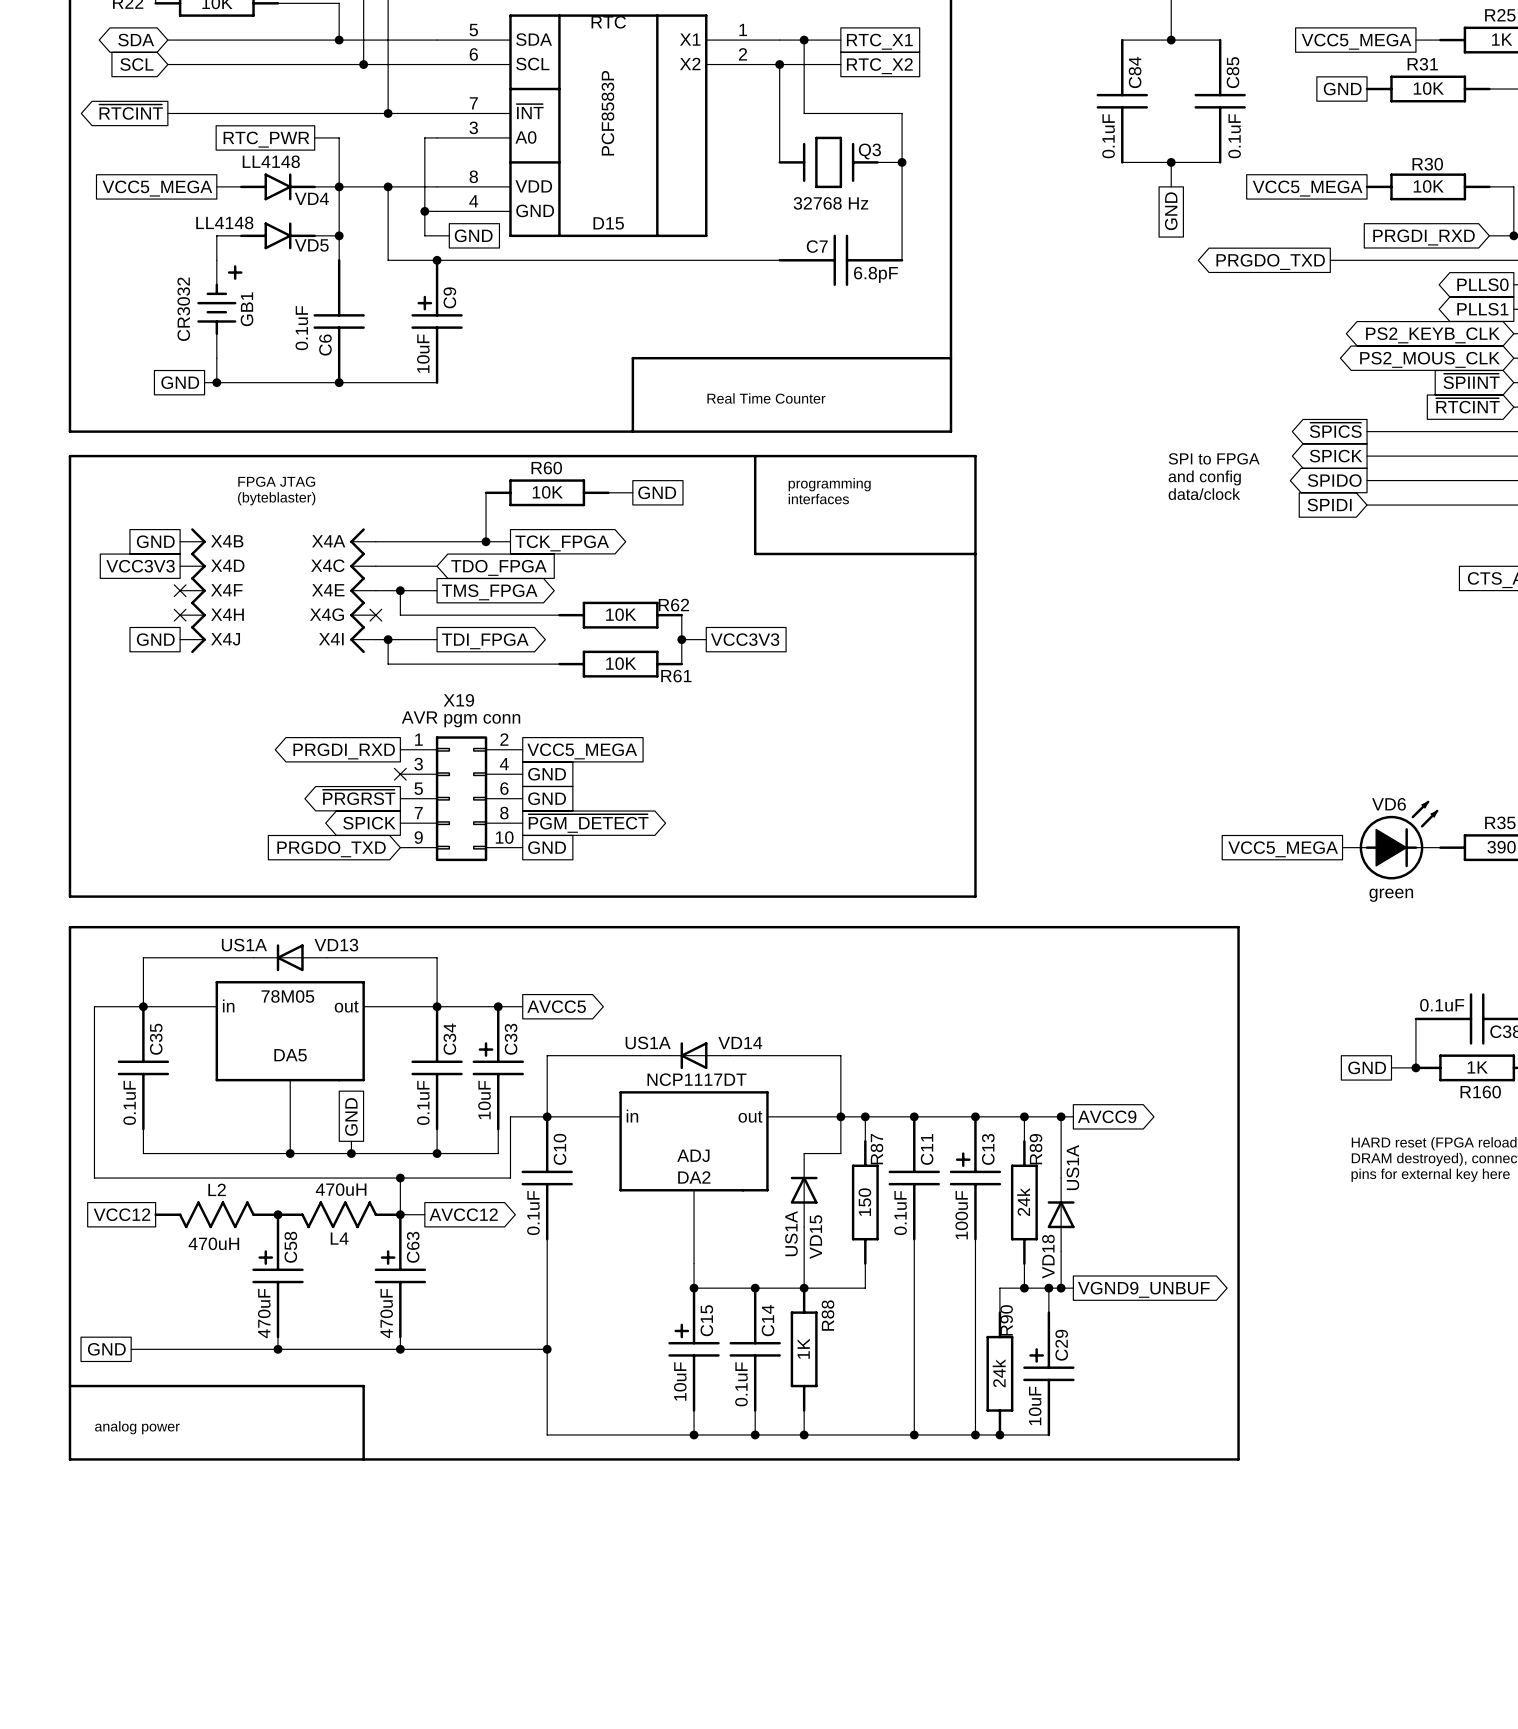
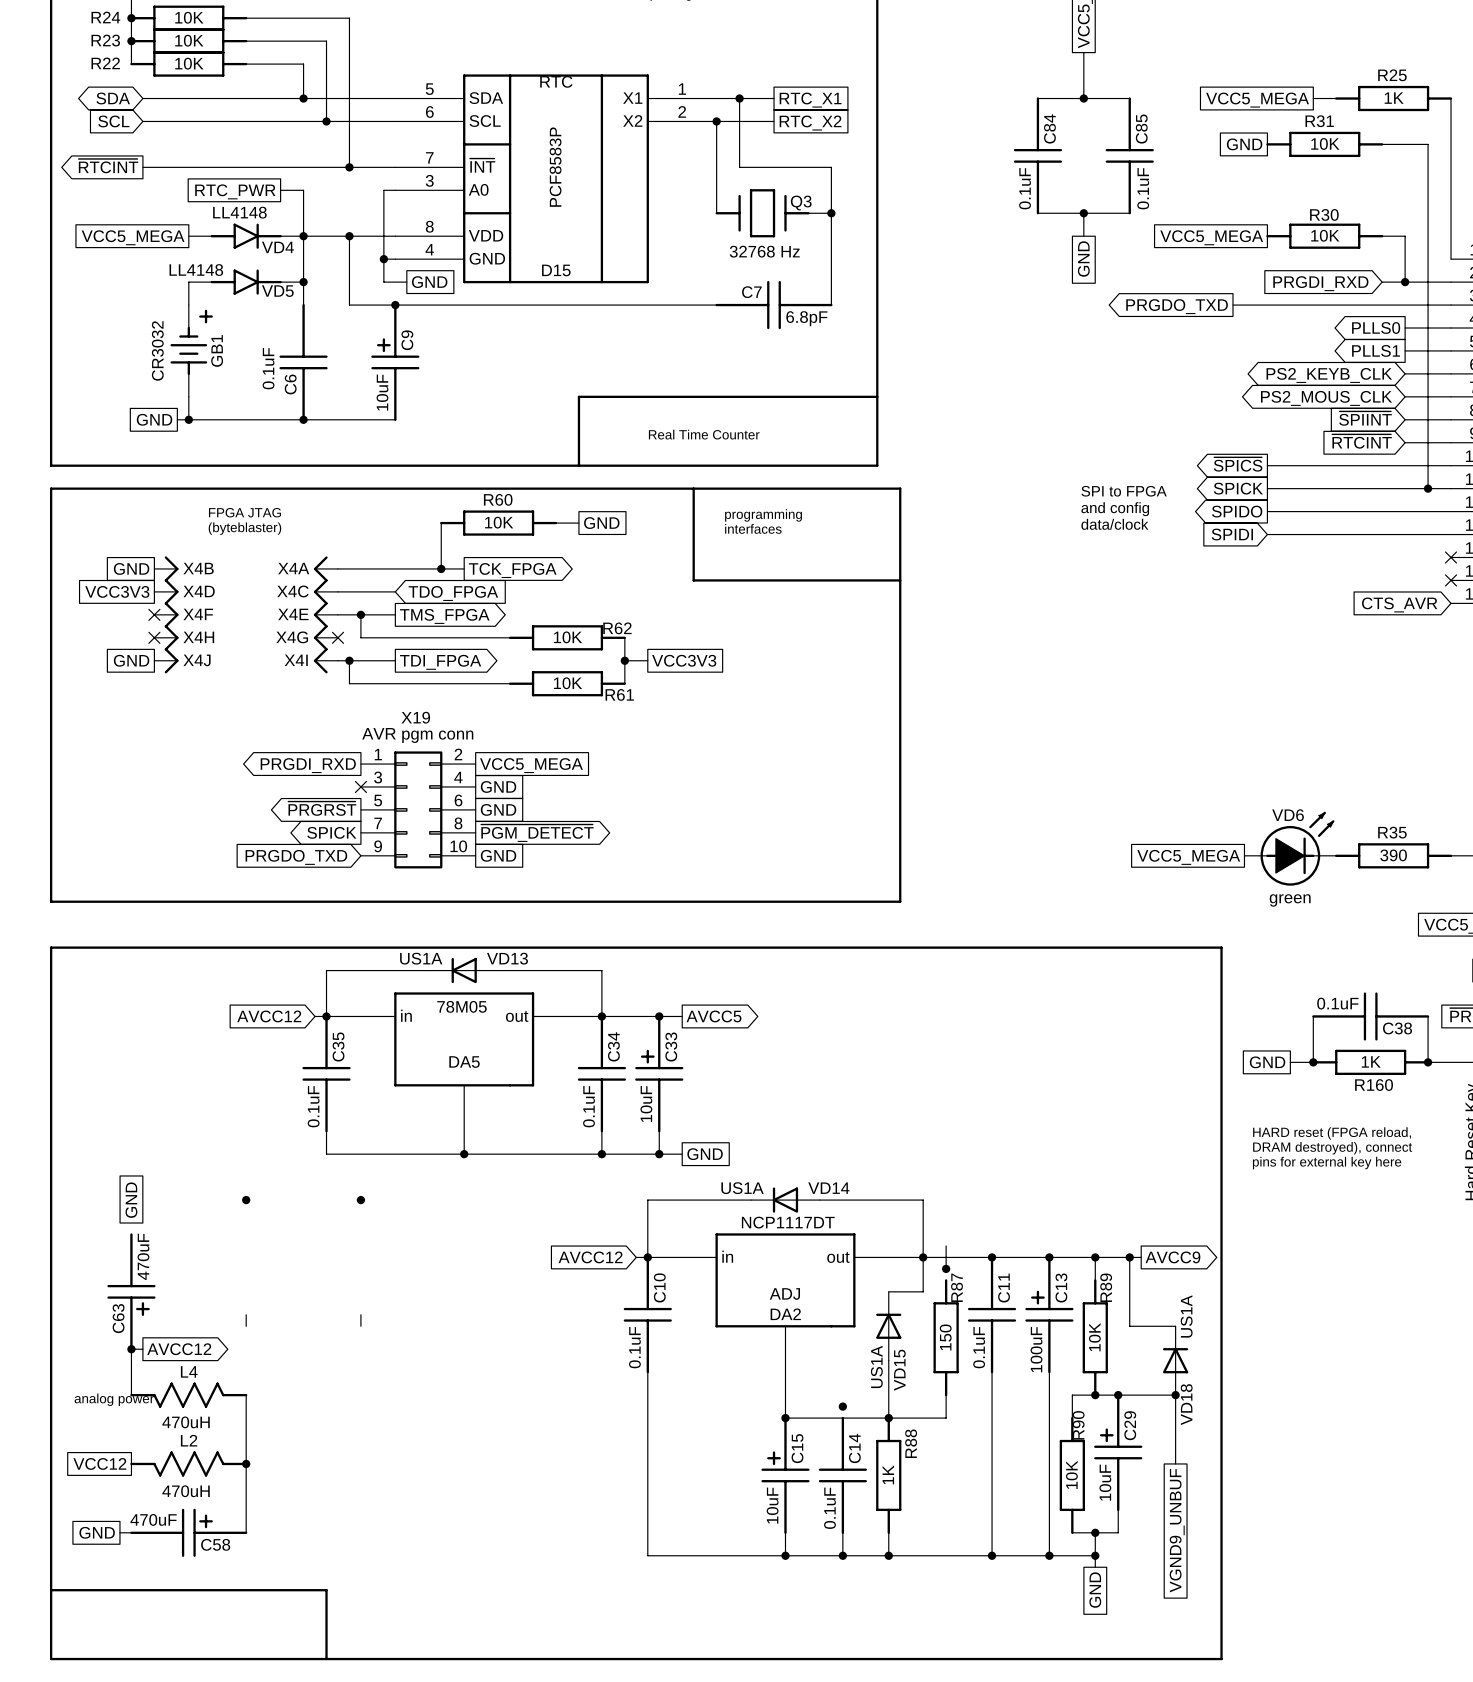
line: (69, 945) (69, 927) (1238, 927) (1238, 1459) (69, 1459) -> (51, 947) (1221, 947) (1221, 1659) (51, 1659) (51, 1429)
wire: (253, 957) (143, 957) (143, 1006) (94, 1006) (94, 1178) (510, 1178) (510, 1116) (547, 1116) (547, 1055) (657, 1055) -> none
VD13 position: (290, 957) -> (464, 970)
wire: (326, 957) (437, 957) (437, 1006) (522, 1006) -> (498, 970) (601, 970) (601, 1016) (682, 1016)
wire: none -> (429, 970) (326, 970) (326, 1016) (315, 1016)
C35 symbol: [117, 1005, 170, 1131] -> [302, 1015, 351, 1133]
C34 symbol: [411, 1005, 463, 1131] -> [577, 1015, 626, 1133]
C33 symbol: [472, 1005, 524, 1131] -> [635, 1015, 684, 1133]
junction: (143, 1006) -> none
junction: (437, 1006) -> none
junction: (498, 1006) -> none
global label position: AVCC5 (556, 1006) -> AVCC5 (713, 1016)
global label: none -> AVCC12 (269, 1016)
junction: none -> (326, 1016)
junction: none -> (601, 1016)
junction: none -> (659, 1016)
VD14 position: (694, 1055) -> (785, 1200)
wire: (730, 1055) (840, 1055) (840, 1153) (804, 1153) -> none
DA5 position: (290, 1067) -> (464, 1073)
C10 symbol: [521, 1115, 573, 1241] -> [623, 1256, 672, 1374]
C11 symbol: [888, 1115, 940, 1241] -> [967, 1256, 1017, 1374]
C13 symbol: [949, 1115, 1002, 1241] -> [1025, 1256, 1074, 1374]
global label: GND (351, 1116) -> none
junction: (547, 1116) -> none
wire: (840, 1116) (1073, 1116) -> (923, 1257) (1141, 1257)
junction: (840, 1116) -> none
wire: (865, 1116) (865, 1141) -> (659, 1131) (659, 1154)
junction: (865, 1116) -> none
junction: (914, 1116) -> none
junction: (975, 1116) -> none
wire: (1024, 1116) (1024, 1141) -> (1095, 1257) (1095, 1280)
junction: (1024, 1116) -> none
wire: (1061, 1116) (1061, 1178) -> none
junction: (1061, 1116) -> none
global label position: AVCC9 (1107, 1116) -> AVCC9 (1172, 1257)
wire: (143, 1129) (143, 1153) (498, 1153) (498, 1129) -> none
wire: (437, 1129) (437, 1153) -> (601, 1131) (601, 1154)
wire: (351, 1141) (351, 1153) -> none
wire: none -> (326, 1131) (326, 1154) (682, 1154)
junction: (290, 1153) -> none
junction: (351, 1153) -> none
junction: (437, 1153) -> none
junction: none -> (464, 1154)
junction: none -> (601, 1154)
junction: none -> (659, 1154)
global label: none -> GND (705, 1154)
DA2 position: (694, 1177) -> (785, 1314)
wire: (400, 1178) (400, 1214) (424, 1214) -> none
junction: (400, 1178) -> none
L4 value position: 470uH (341, 1189) -> 470uH (186, 1422)
VD15 position: (804, 1190) -> (888, 1326)
R87 position: (865, 1202) -> (946, 1337)
R89 value: 24k (1023, 1202) -> 10K (1094, 1337)
R89 position: (1024, 1202) -> (1095, 1337)
C63 symbol: [374, 1213, 427, 1339] -> [107, 1233, 156, 1351]
global label: VCC12 (121, 1214) -> none
global label: none -> GND (131, 1200)
L2 position: (216, 1214) -> (188, 1463)
L4 position: (339, 1214) -> (188, 1395)
global label: AVCC12 (463, 1214) -> none
wire: none -> (751, 1200) (647, 1200) (647, 1257) (636, 1257)
VD18 position: (1061, 1214) -> (1175, 1360)
wire: (804, 1226) (804, 1288) -> (888, 1360) (888, 1418)
L4 name position: L4 (339, 1238) -> L4 (189, 1371)
wire: (547, 1239) (547, 1434) (1048, 1434) -> none
wire: (914, 1239) (914, 1434) -> (992, 1372) (992, 1555)
wire: (975, 1239) (975, 1434) -> (1049, 1372) (1049, 1555)
C63 name position: C63 (413, 1247) -> C63 (118, 1318)
wire: (1061, 1251) (1061, 1288) -> none
VD18 name position: VD18 (1048, 1256) -> VD18 (1186, 1404)
wire: (694, 1263) (694, 1288) (865, 1288) (865, 1263) -> (785, 1395) (785, 1418) (946, 1418) (946, 1395)
C58 rotation: 0° (278, 1275) -> 90° clockwise (188, 1532)
C58 position: (278, 1275) -> (188, 1532)
global label: none -> AVCC12 (590, 1257)
junction: none -> (923, 1257)
junction: none -> (992, 1257)
junction: none -> (1049, 1257)
junction: none -> (1095, 1257)
wire: none -> (1129, 1257) (1129, 1326) (1175, 1326)
junction: none -> (1129, 1257)
junction position: (694, 1288) -> (647, 1257)
junction: (755, 1288) -> none
junction: (804, 1288) -> none
wire: (999, 1288) (1073, 1288) -> (923, 1268) (923, 1200) (819, 1200)
wire: (1048, 1288) (1048, 1312) -> none
junction: (1048, 1288) -> none
junction: (1061, 1288) -> none
global label: VGND9_UNBUF (1143, 1289) -> none
C29 symbol: [1023, 1311, 1075, 1437] -> [1094, 1393, 1143, 1512]
wire: none -> (888, 1291) (923, 1291)
C63 value position: 470uF (386, 1313) -> 470uF (143, 1256)
global label: GND (106, 1349) -> none
wire: (131, 1349) (547, 1349) -> none
junction: (278, 1349) -> none
junction: (400, 1349) -> none
junction: (547, 1349) -> none
C15 position: (694, 1349) -> (785, 1475)
C14 position: (755, 1349) -> (842, 1475)
R88 position: (804, 1349) -> (888, 1475)
junction: none -> (131, 1349)
wire: none -> (142, 1349) (131, 1349) (131, 1395)
global label: none -> AVCC12 (179, 1349)
R90 position: (999, 1373) -> (1072, 1475)
R90 value: 24k (999, 1373) -> 10K (1071, 1474)
line: (69, 1386) (363, 1386) (363, 1459) -> none
wire: none -> (647, 1372) (647, 1555) (1095, 1555)
wire: (694, 1410) (694, 1434) -> (785, 1532) (785, 1555)
wire: (755, 1410) (755, 1434) -> (842, 1532) (842, 1555)
wire: (804, 1410) (804, 1434) -> (888, 1532) (888, 1555)
wire: none -> (246, 1395) (246, 1532)
junction: none -> (1095, 1395)
junction: none -> (1118, 1395)
junction: none -> (1175, 1395)
junction: (694, 1434) -> none
junction: (755, 1434) -> none
junction: (804, 1434) -> none
junction position: (975, 1434) -> (888, 1418)
junction: (999, 1434) -> none
junction: none -> (785, 1418)
wire: none -> (1072, 1418) (1072, 1395) (1175, 1395) (1175, 1463)
global label: none -> VCC12 (99, 1463)
junction: none -> (246, 1463)
wire: none -> (1118, 1509) (1118, 1532) (1072, 1532)
global label: none -> VGND9_UNBUF (1177, 1530)
global label: none -> GND (97, 1532)
wire: none -> (119, 1532) (131, 1532)
wire: none -> (1095, 1532) (1095, 1567)
junction: none -> (1095, 1532)
junction: none -> (785, 1555)
junction: none -> (842, 1555)
junction: none -> (888, 1555)
junction: none -> (992, 1555)
junction: none -> (1049, 1555)
junction: none -> (1095, 1555)
line: none -> (51, 1590) (326, 1590) (326, 1659)
global label: none -> GND (1095, 1590)

